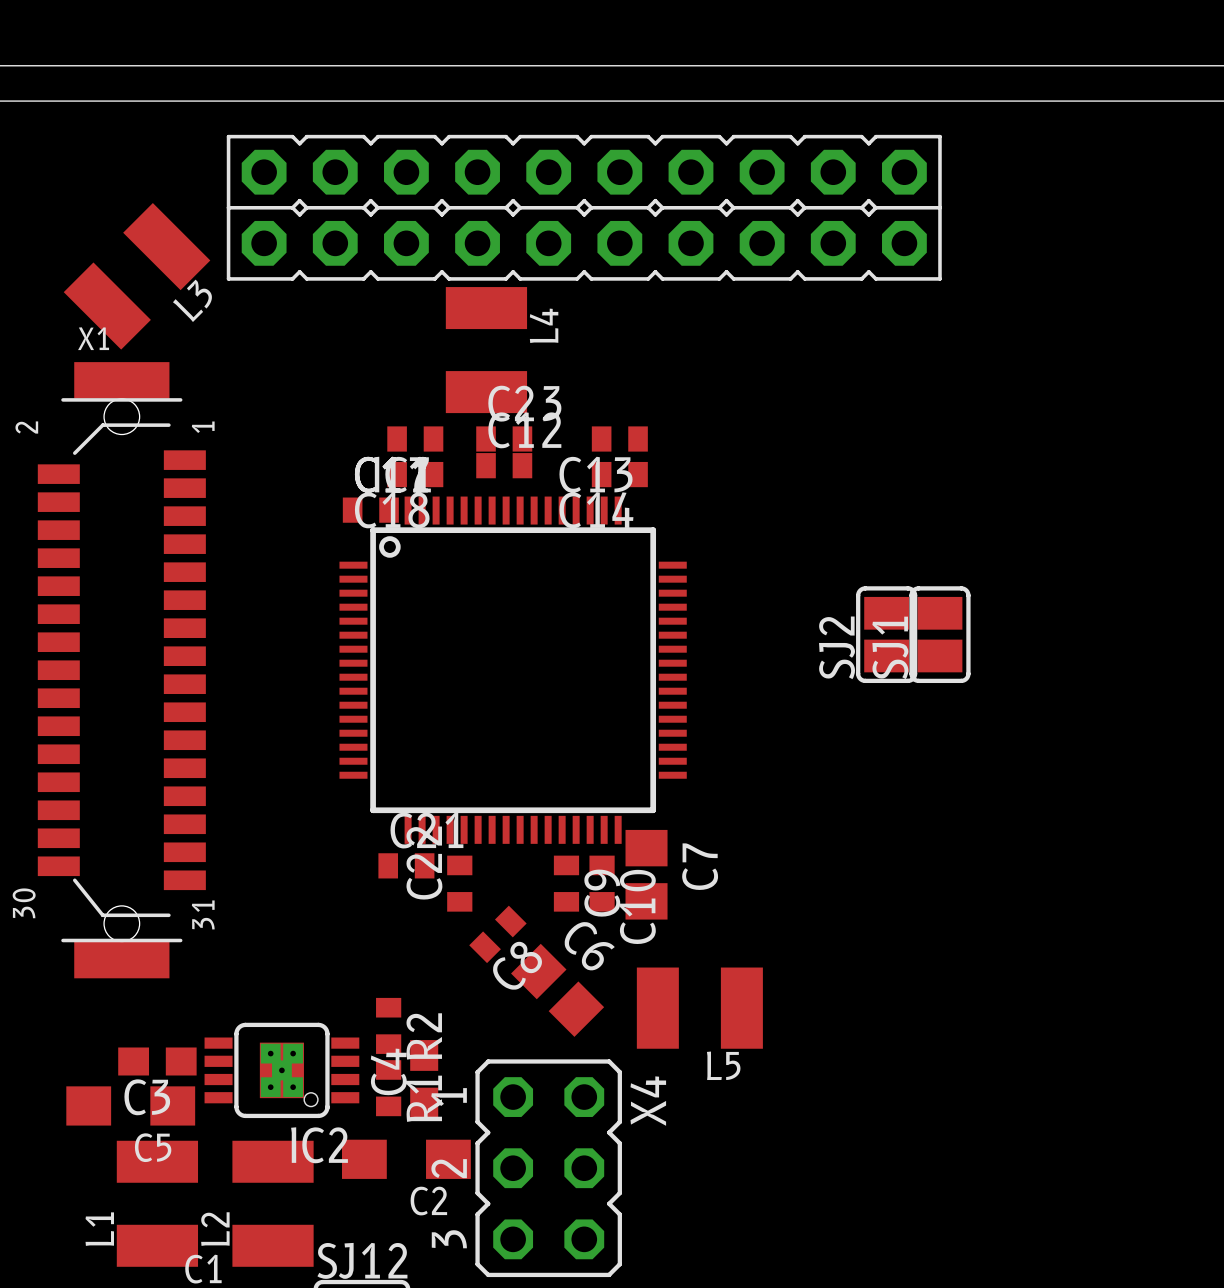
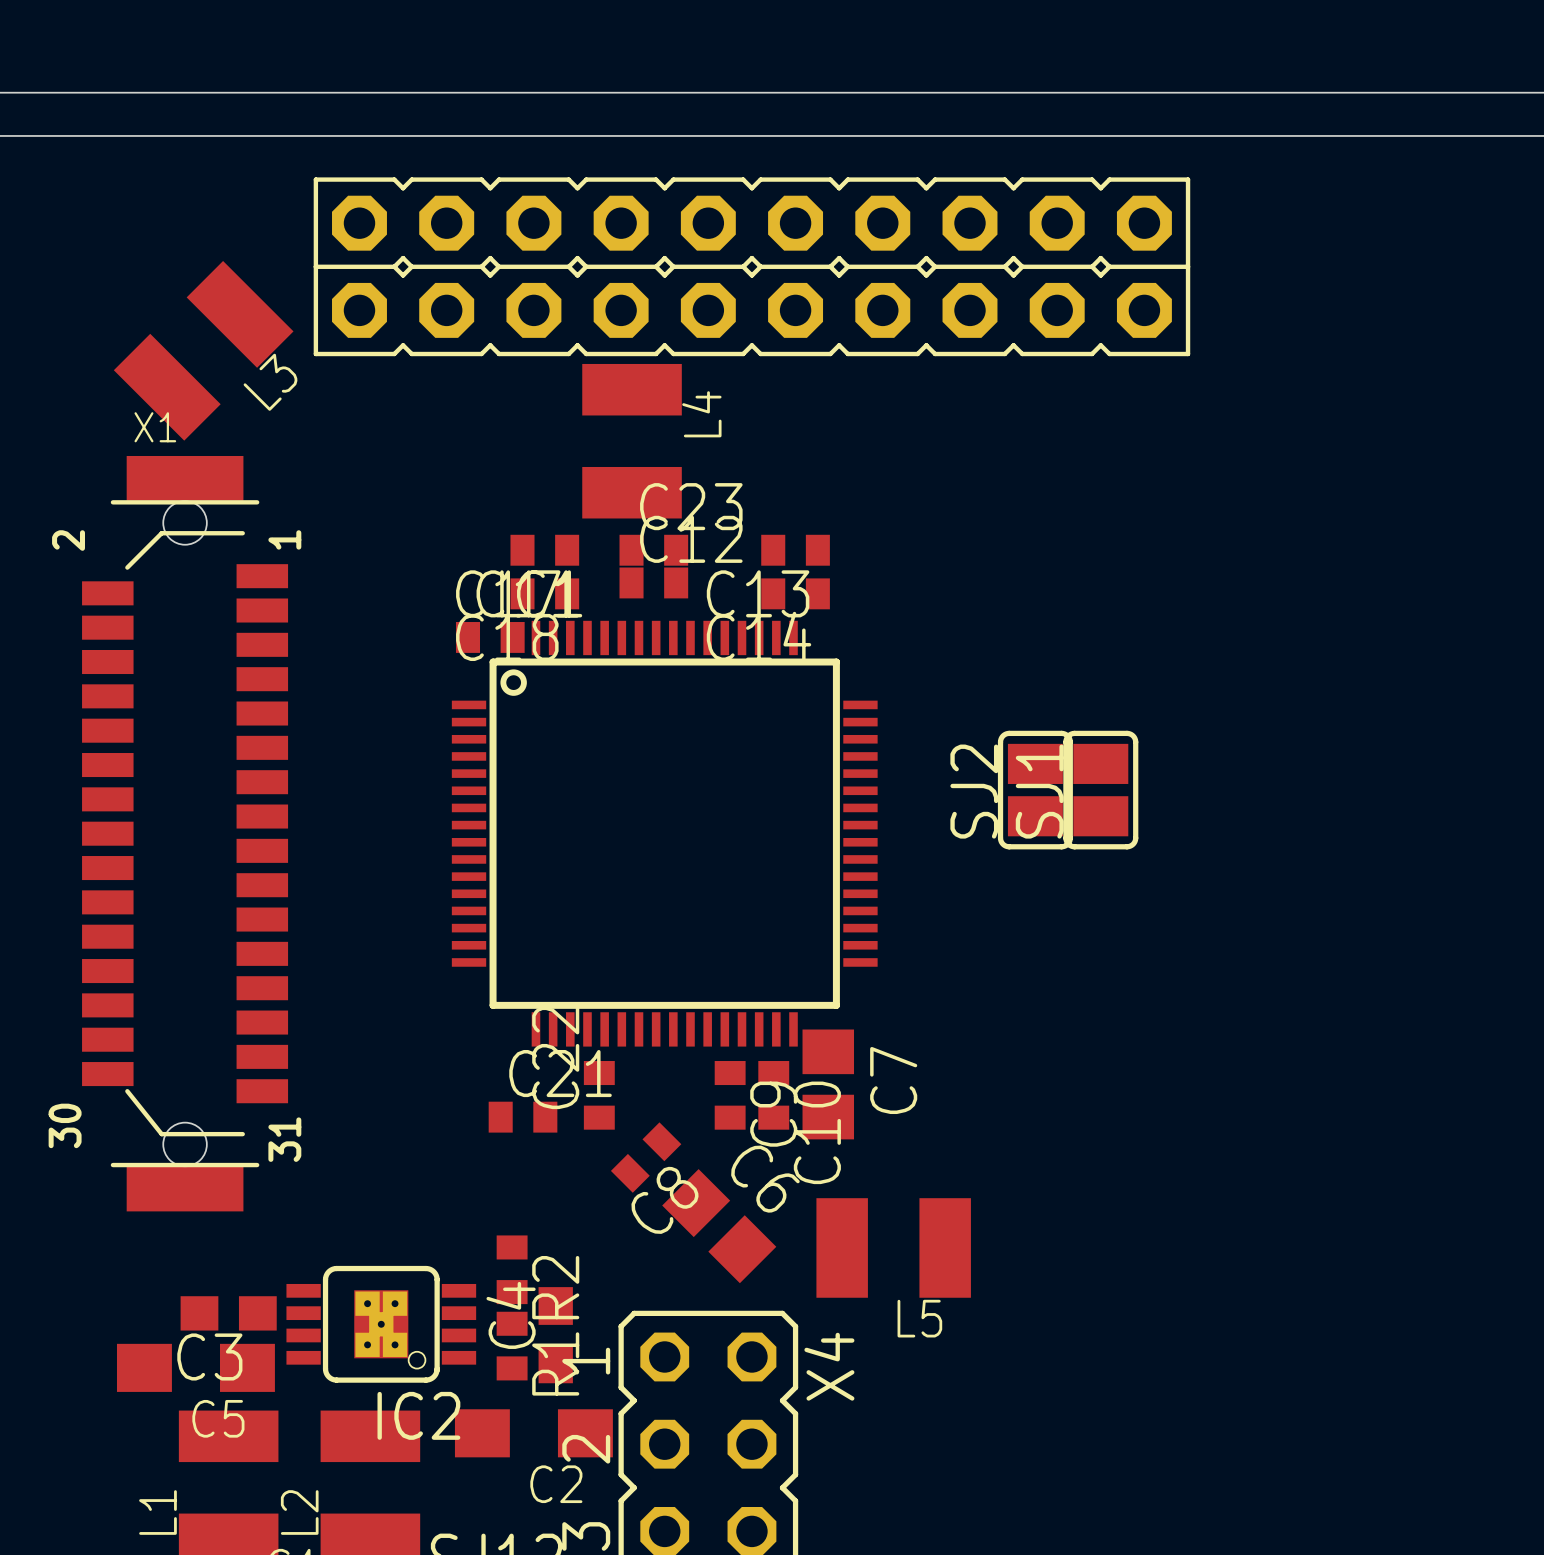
SJ2 position: (886, 634) -> (1035, 790)
SJ1 position: (939, 634) -> (1100, 790)
C21 position: (406, 865) -> (523, 1117)

